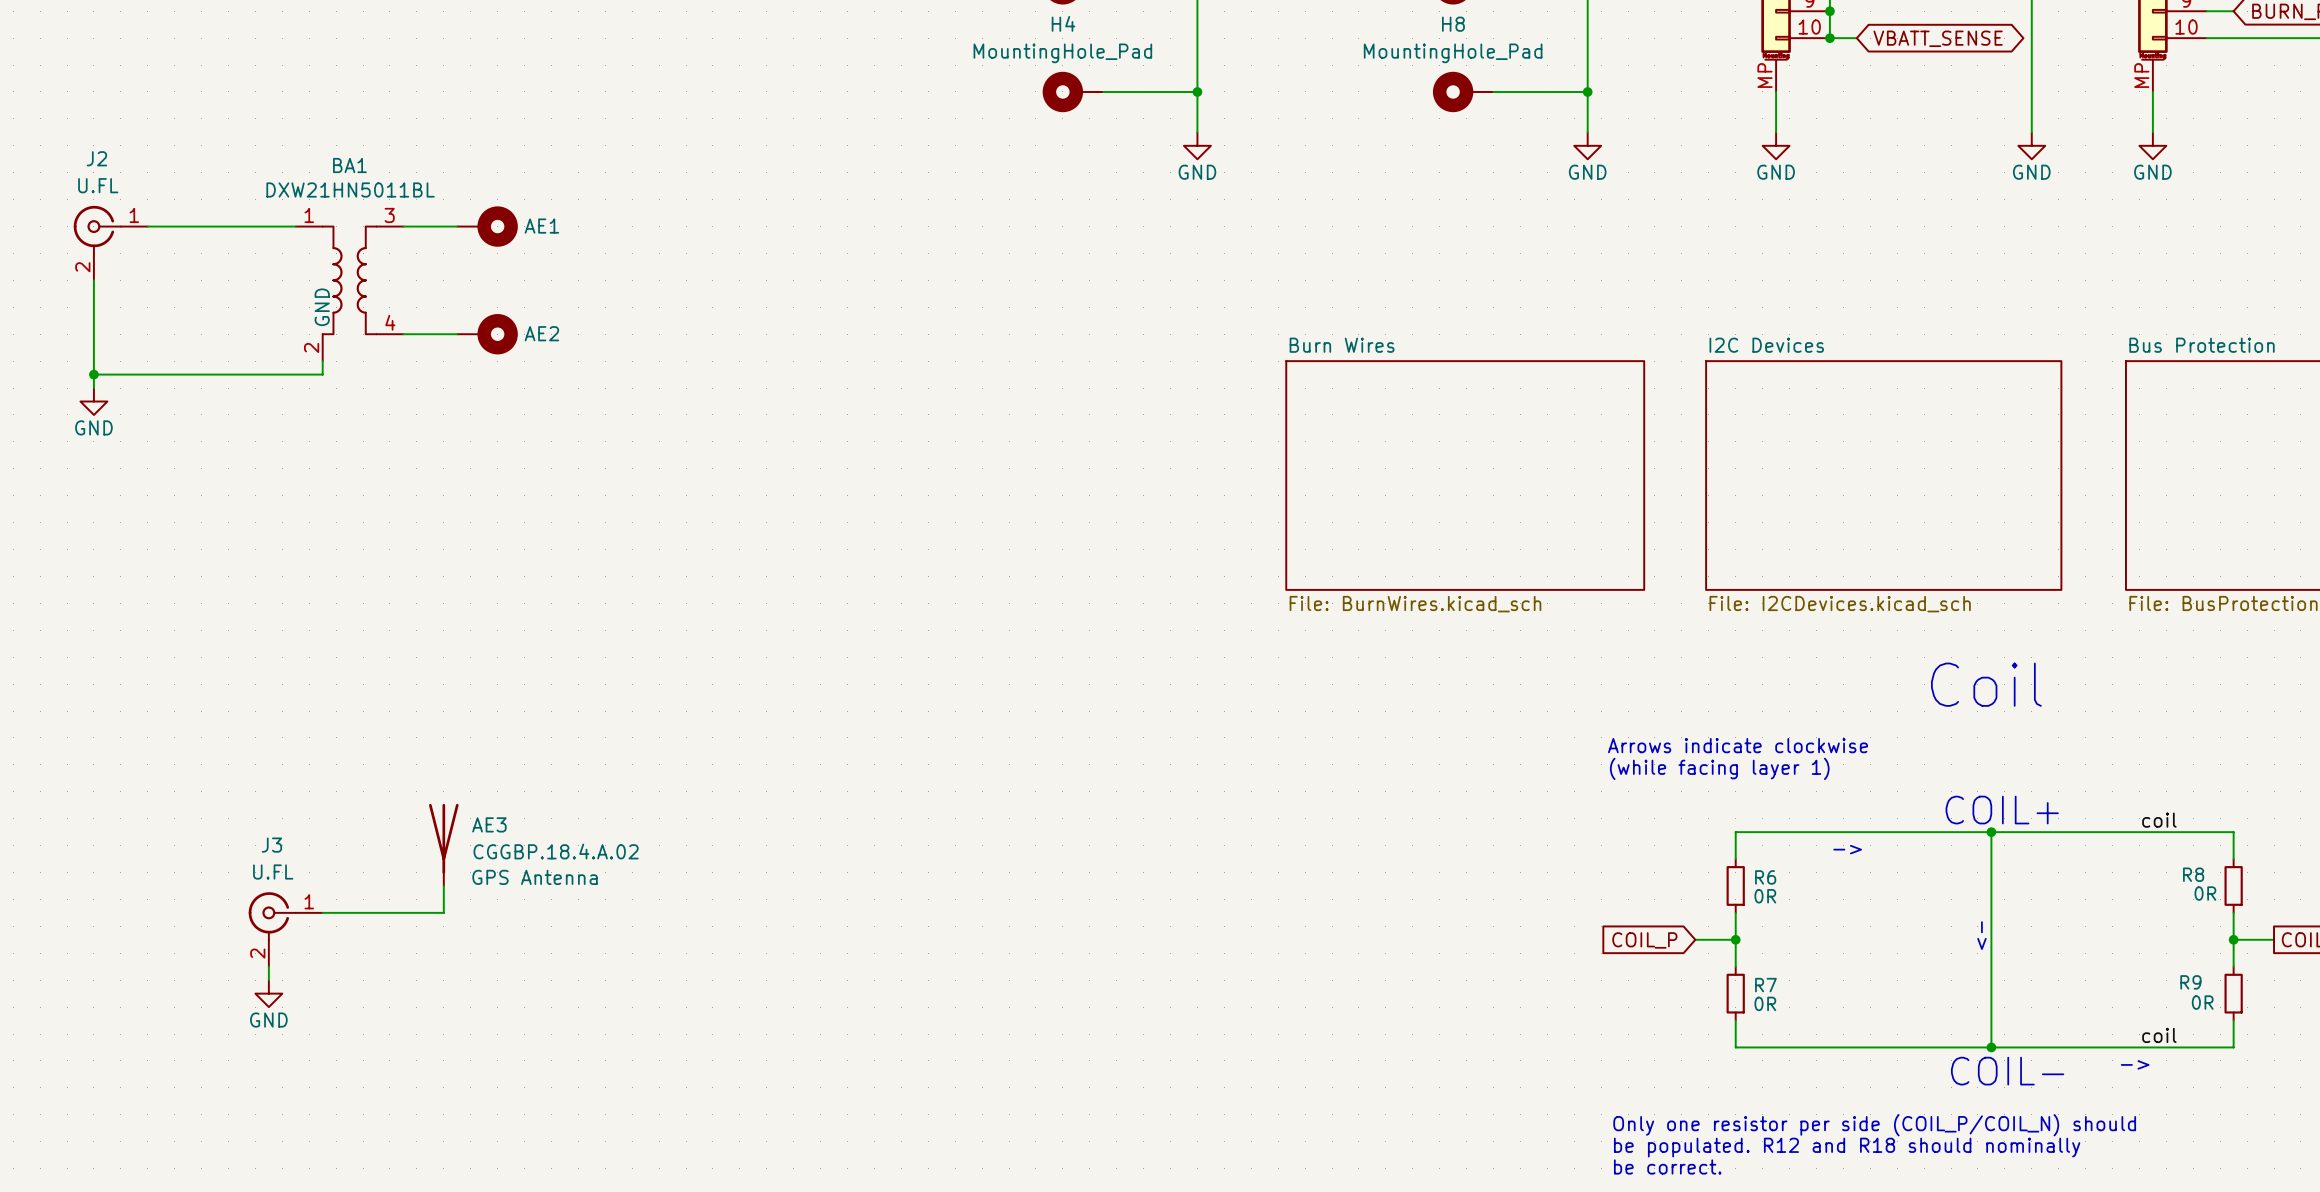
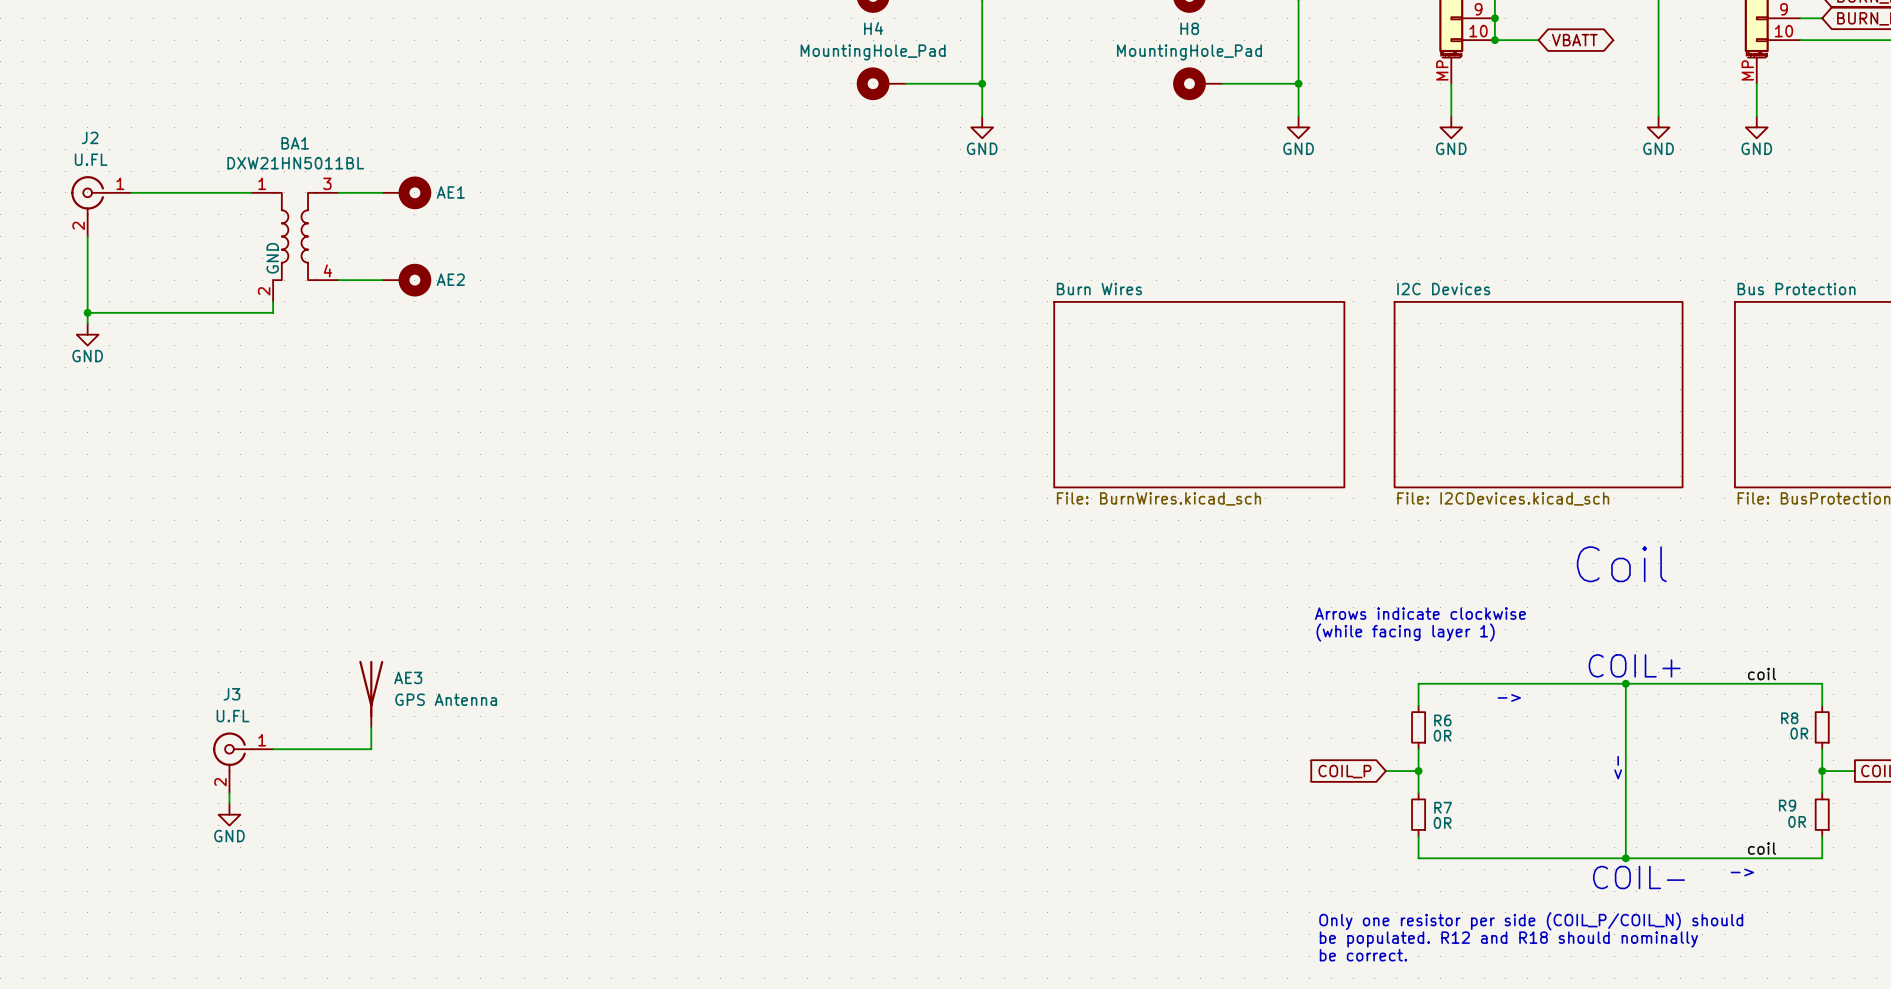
wire: none -> (1516, 40) (1538, 40)
global label: VBATT_SENSE (1938, 38) -> VBATT (1574, 40)
AE3 value: CGGBP.18.4.A.02 (556, 851) -> GPS Antenna (446, 699)
AE3 text: GPS Antenna (535, 877) -> none

